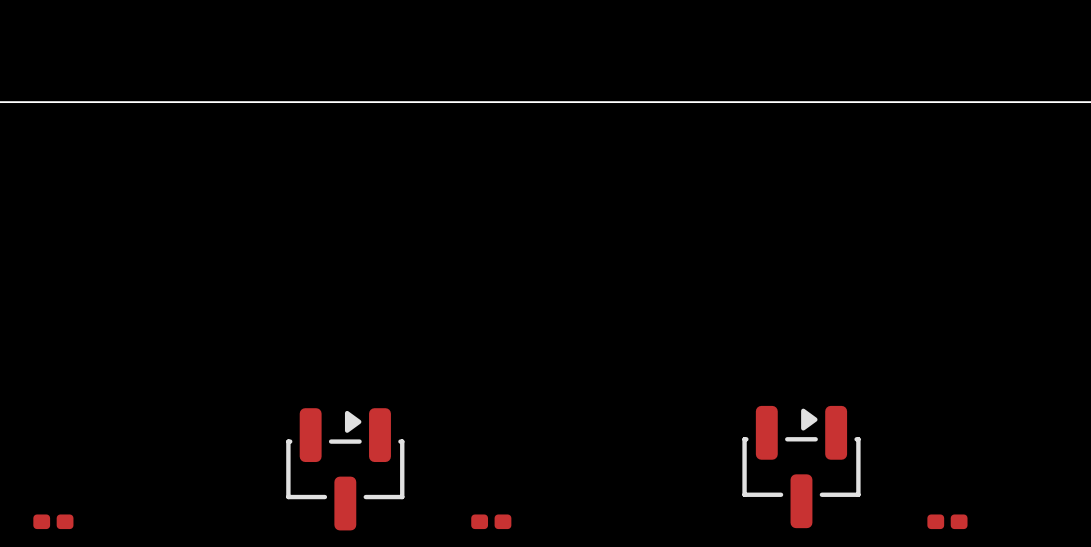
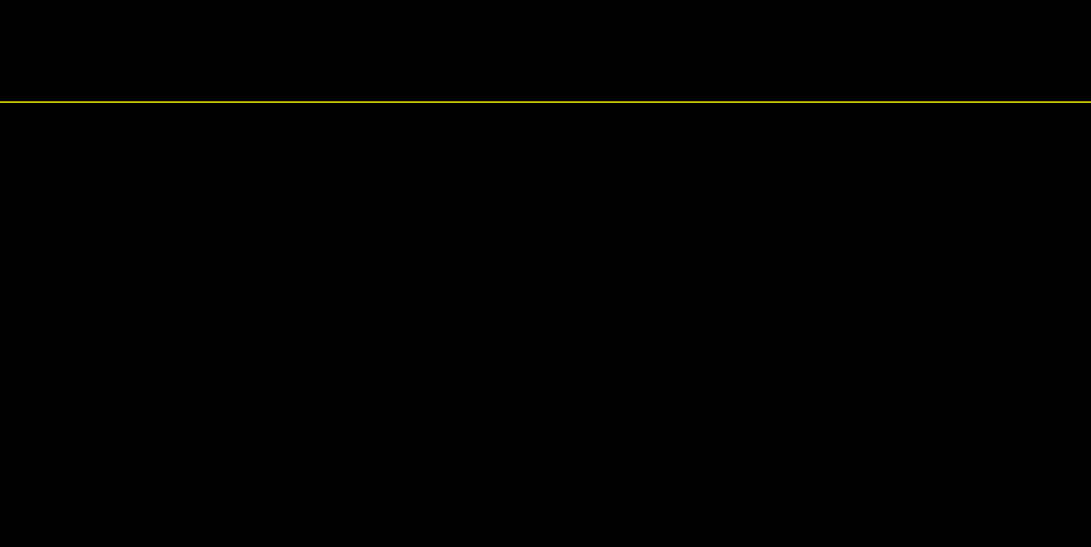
part: (801, 467) -> none
part: (345, 469) -> none
part: (53, 521) -> none
part: (491, 521) -> none
part: (947, 521) -> none

